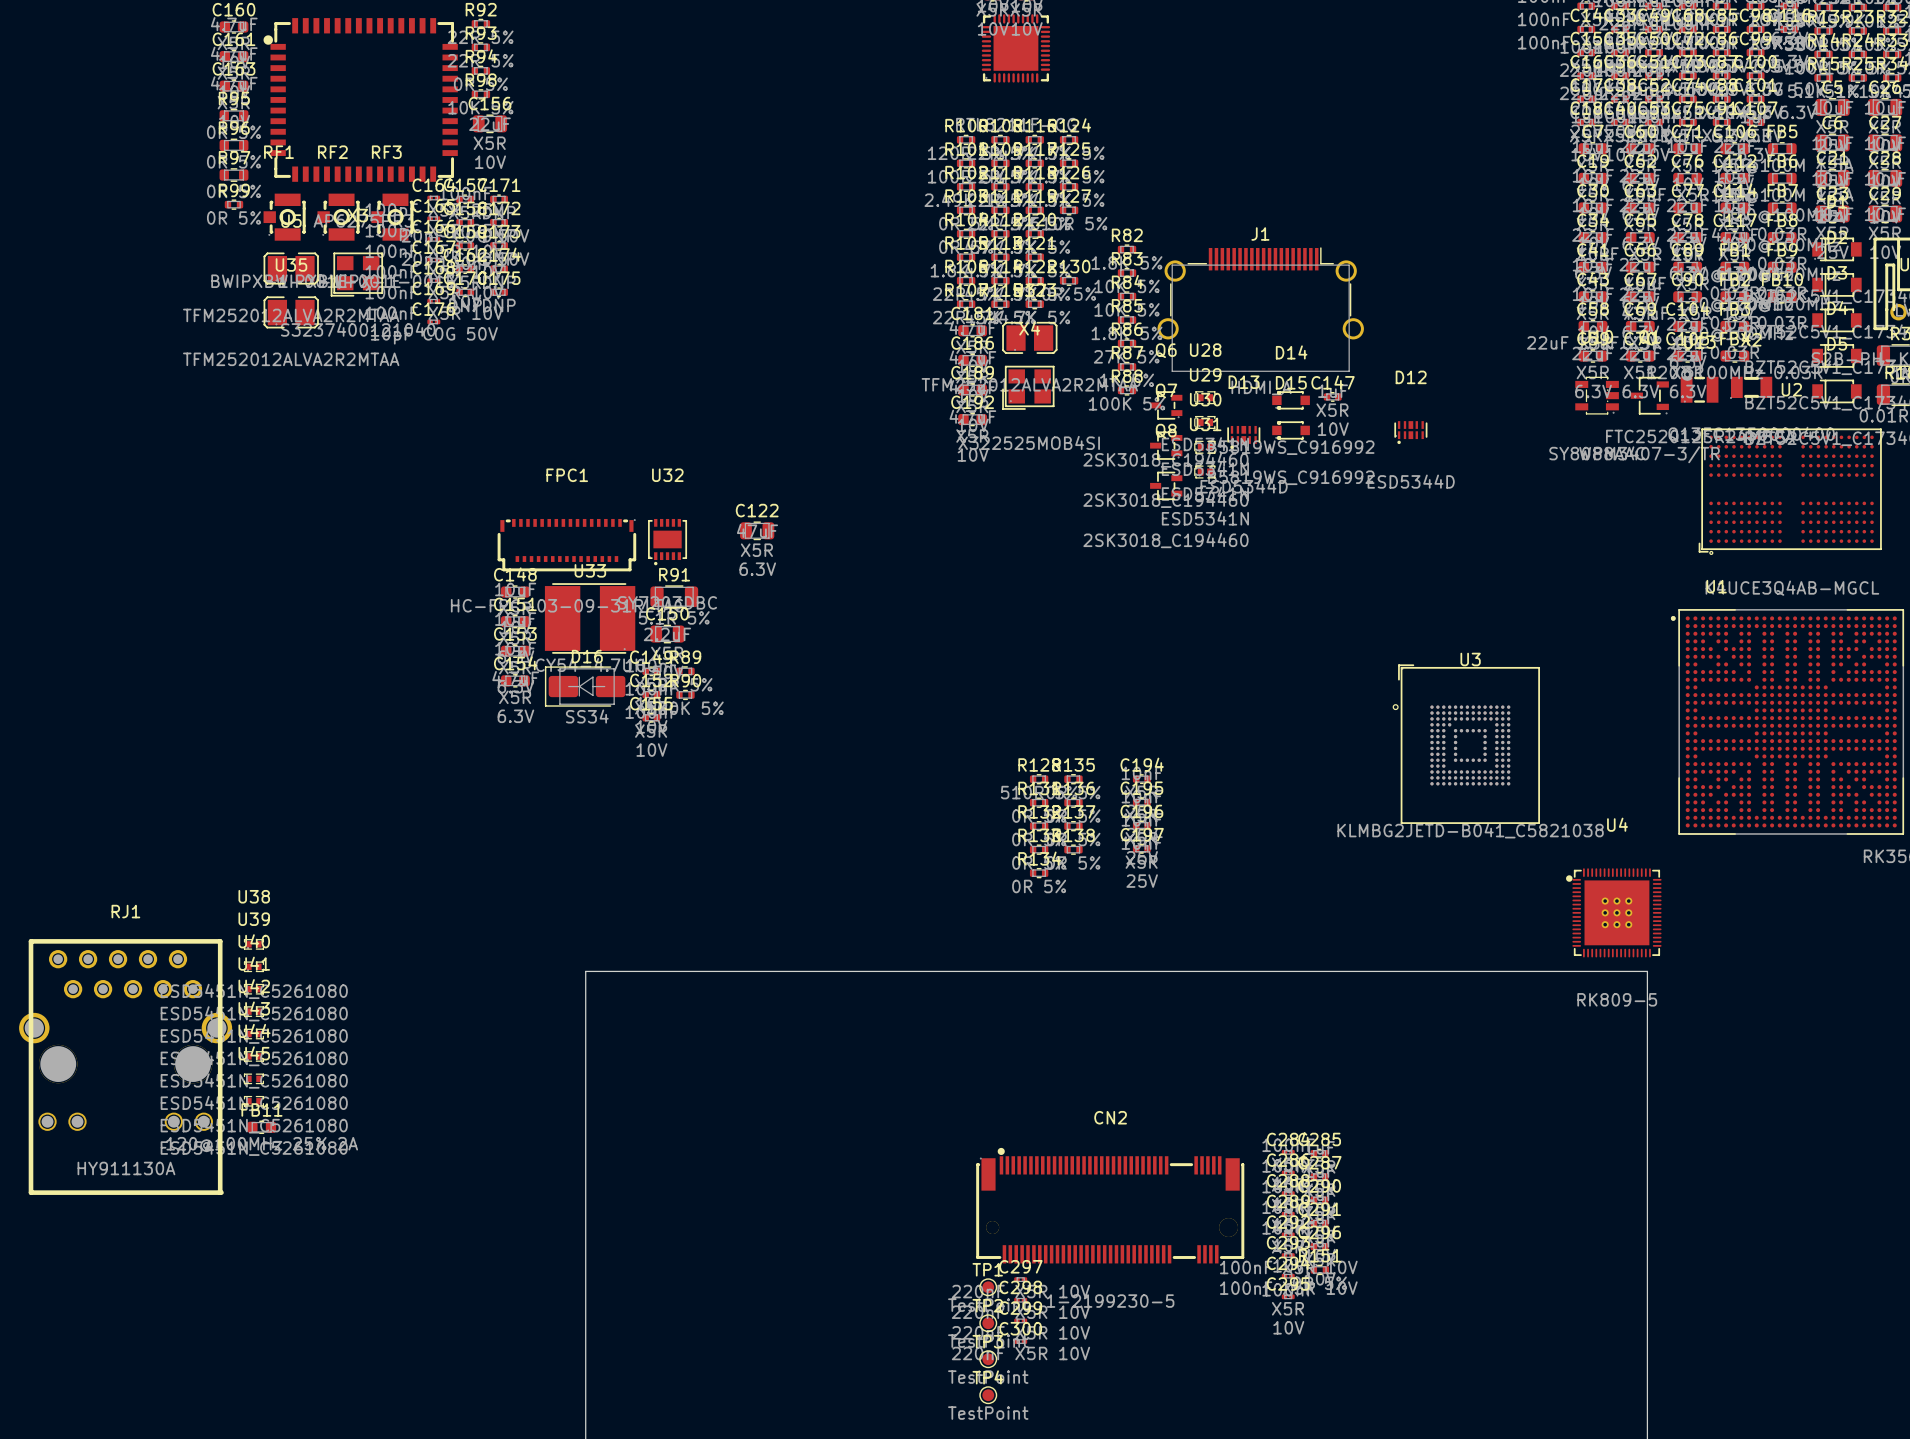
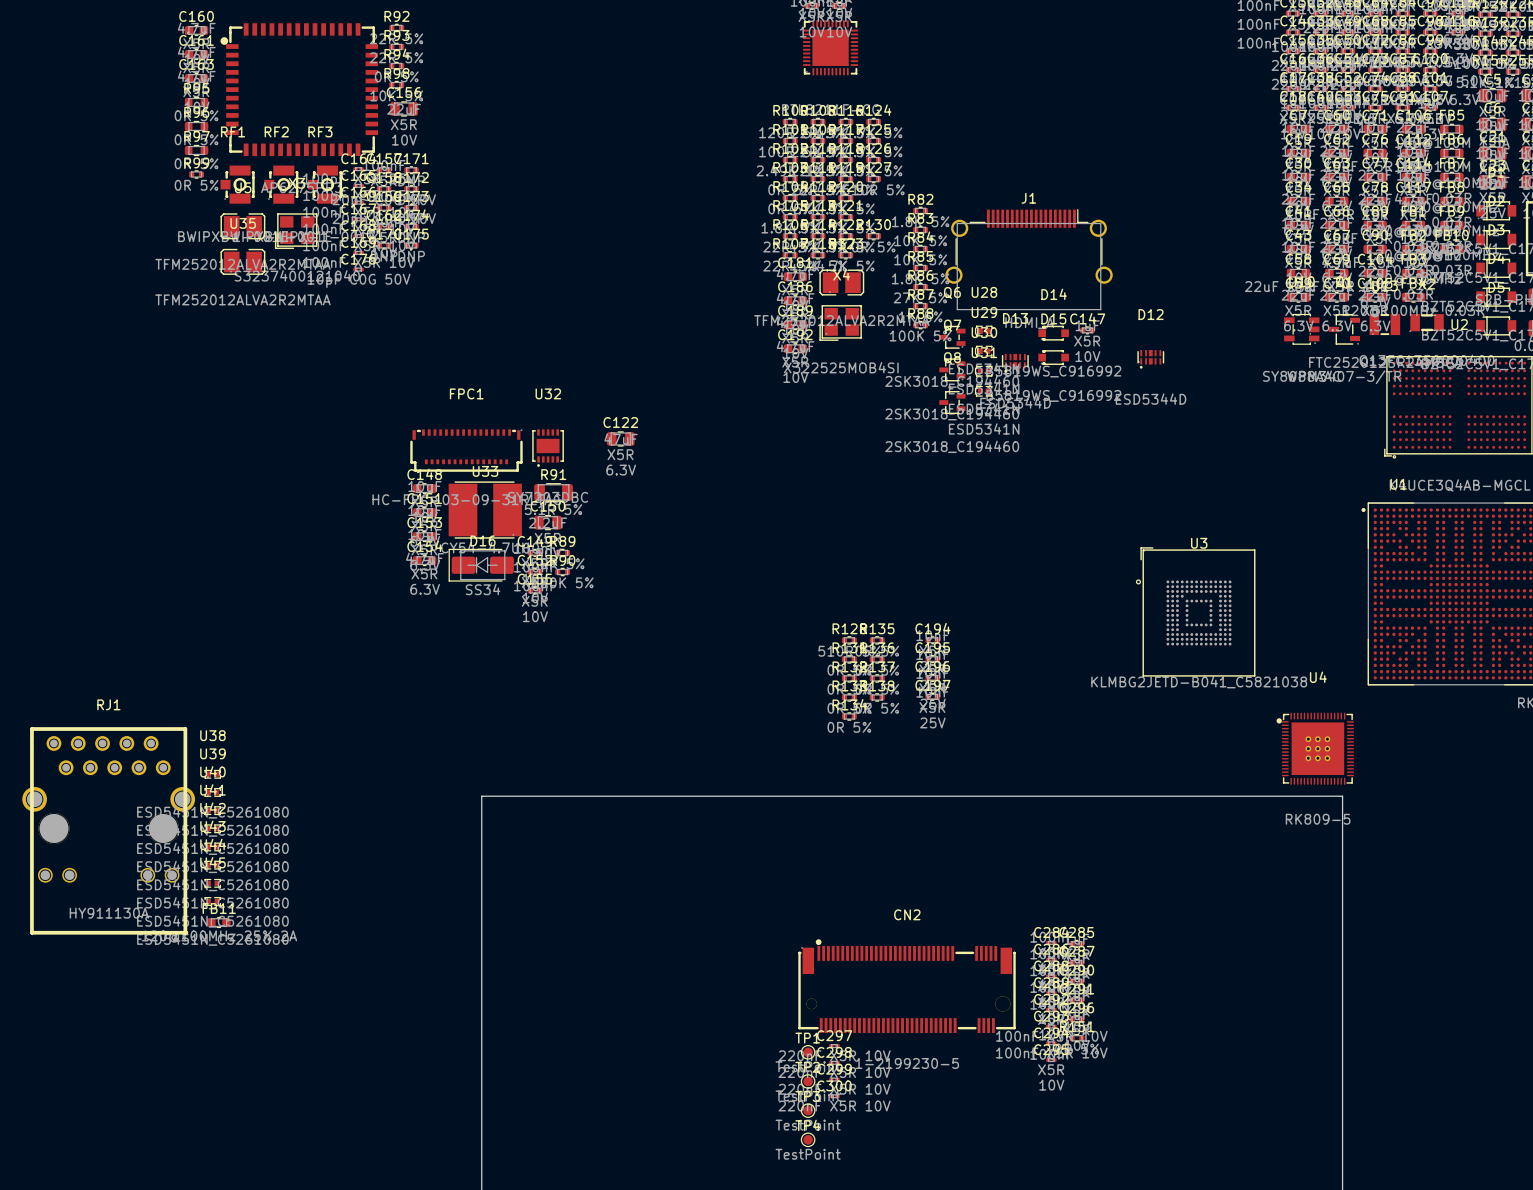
RJ1 position: (125, 1067) -> (108, 830)

